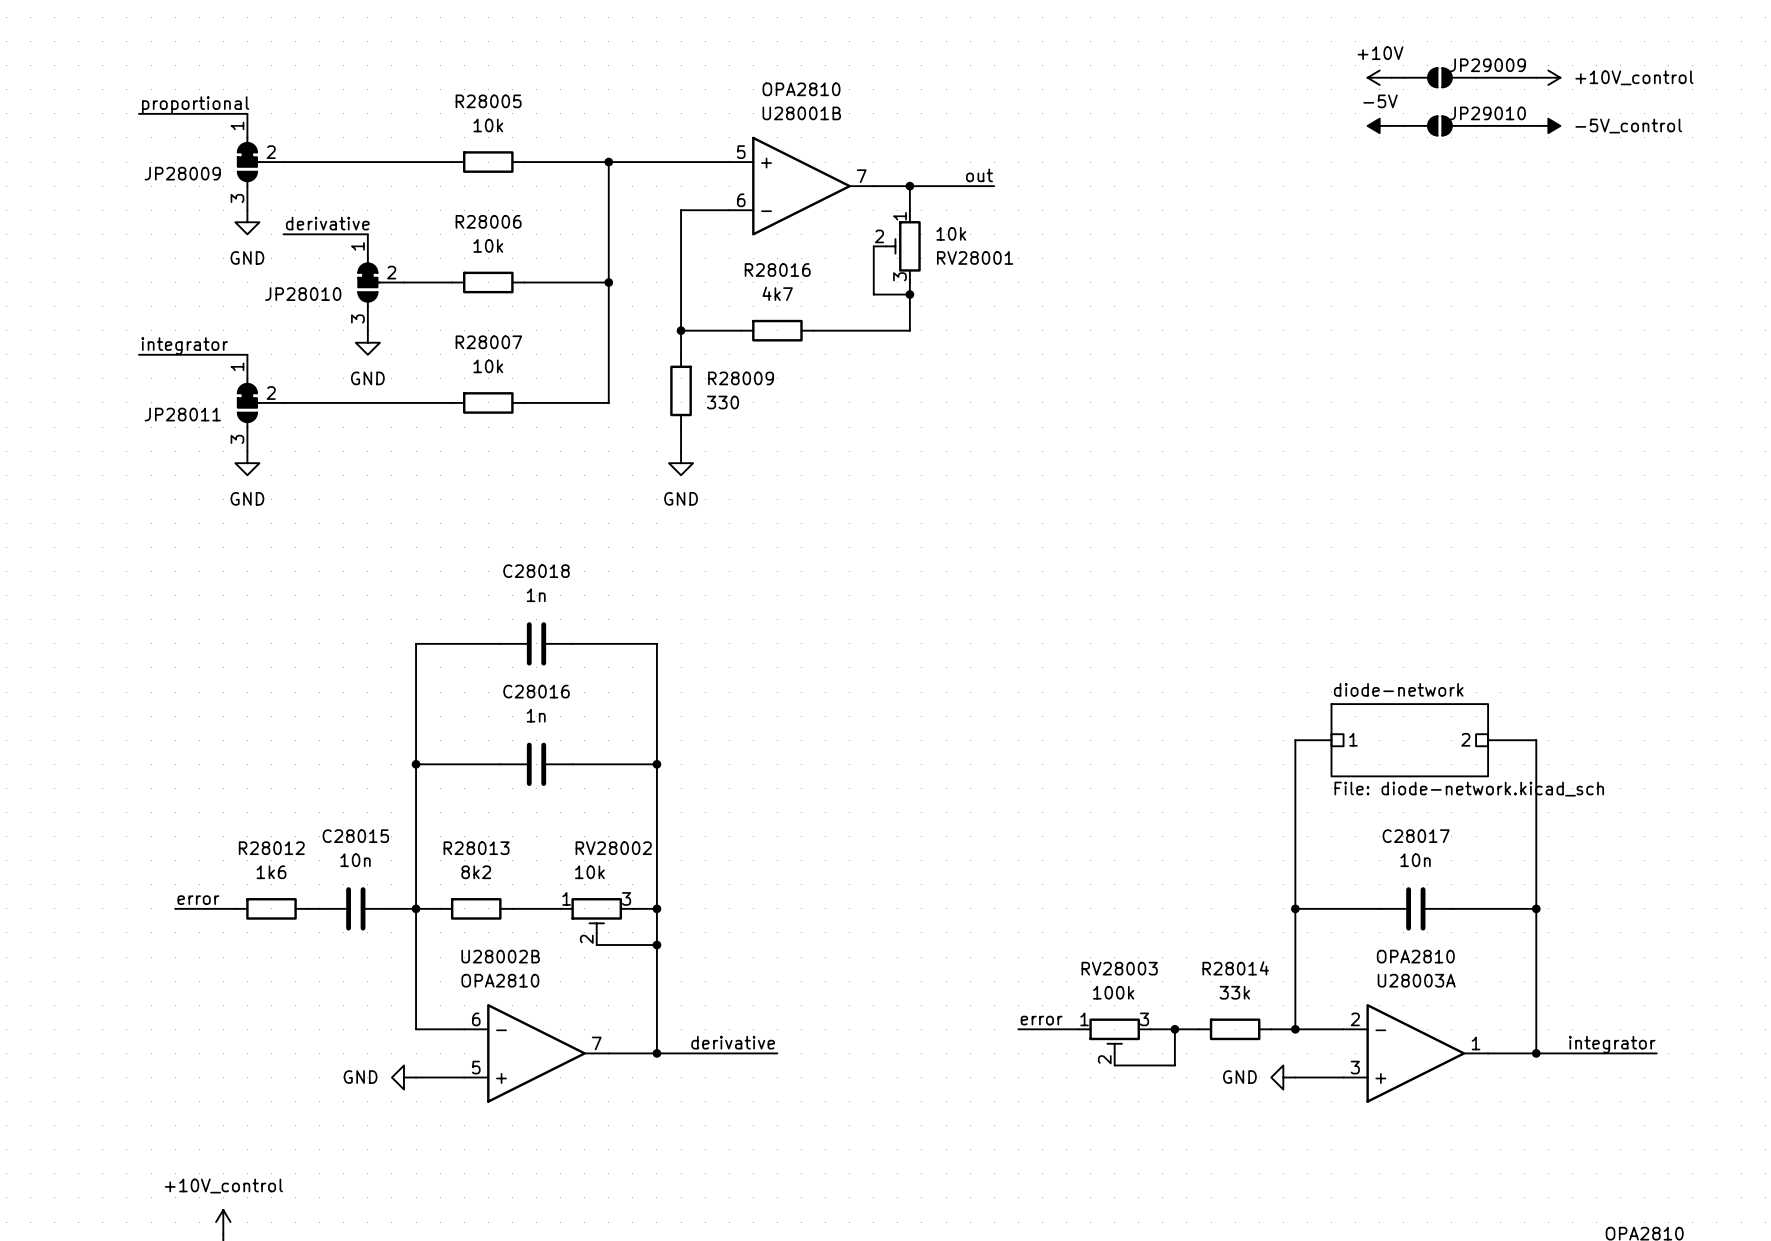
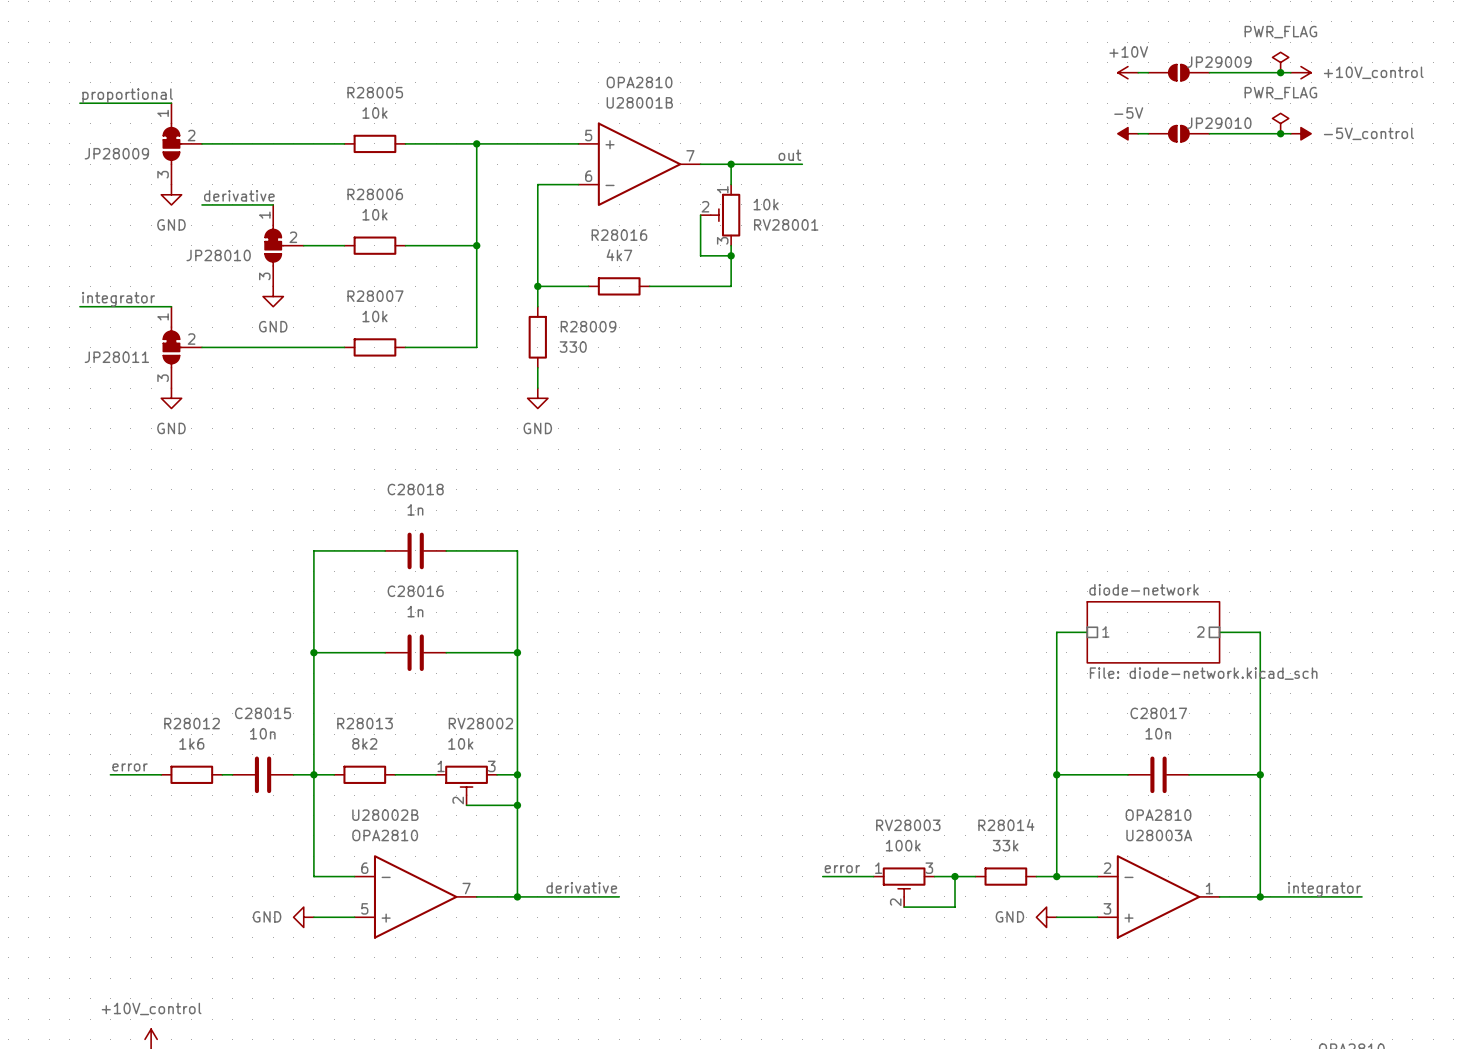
power symbol: none -> PWR_FLAG (1280, 62)
power symbol position: +10V_control (1548, 77) -> +10V_control (1300, 72)
junction: none -> (1280, 72)
power symbol position: -5V (1379, 125) -> -5V (1127, 133)
wire: (1391, 125) (1403, 125) -> (1138, 133) (1148, 133)
JP29010 position: (1439, 125) -> (1178, 133)
wire: (1476, 125) (1536, 125) -> none
power symbol position: -5V_control (1548, 125) -> -5V_control (1300, 133)
power symbol: none -> PWR_FLAG (1280, 123)
wire: none -> (1209, 133) (1290, 133)
junction: none -> (1280, 133)

